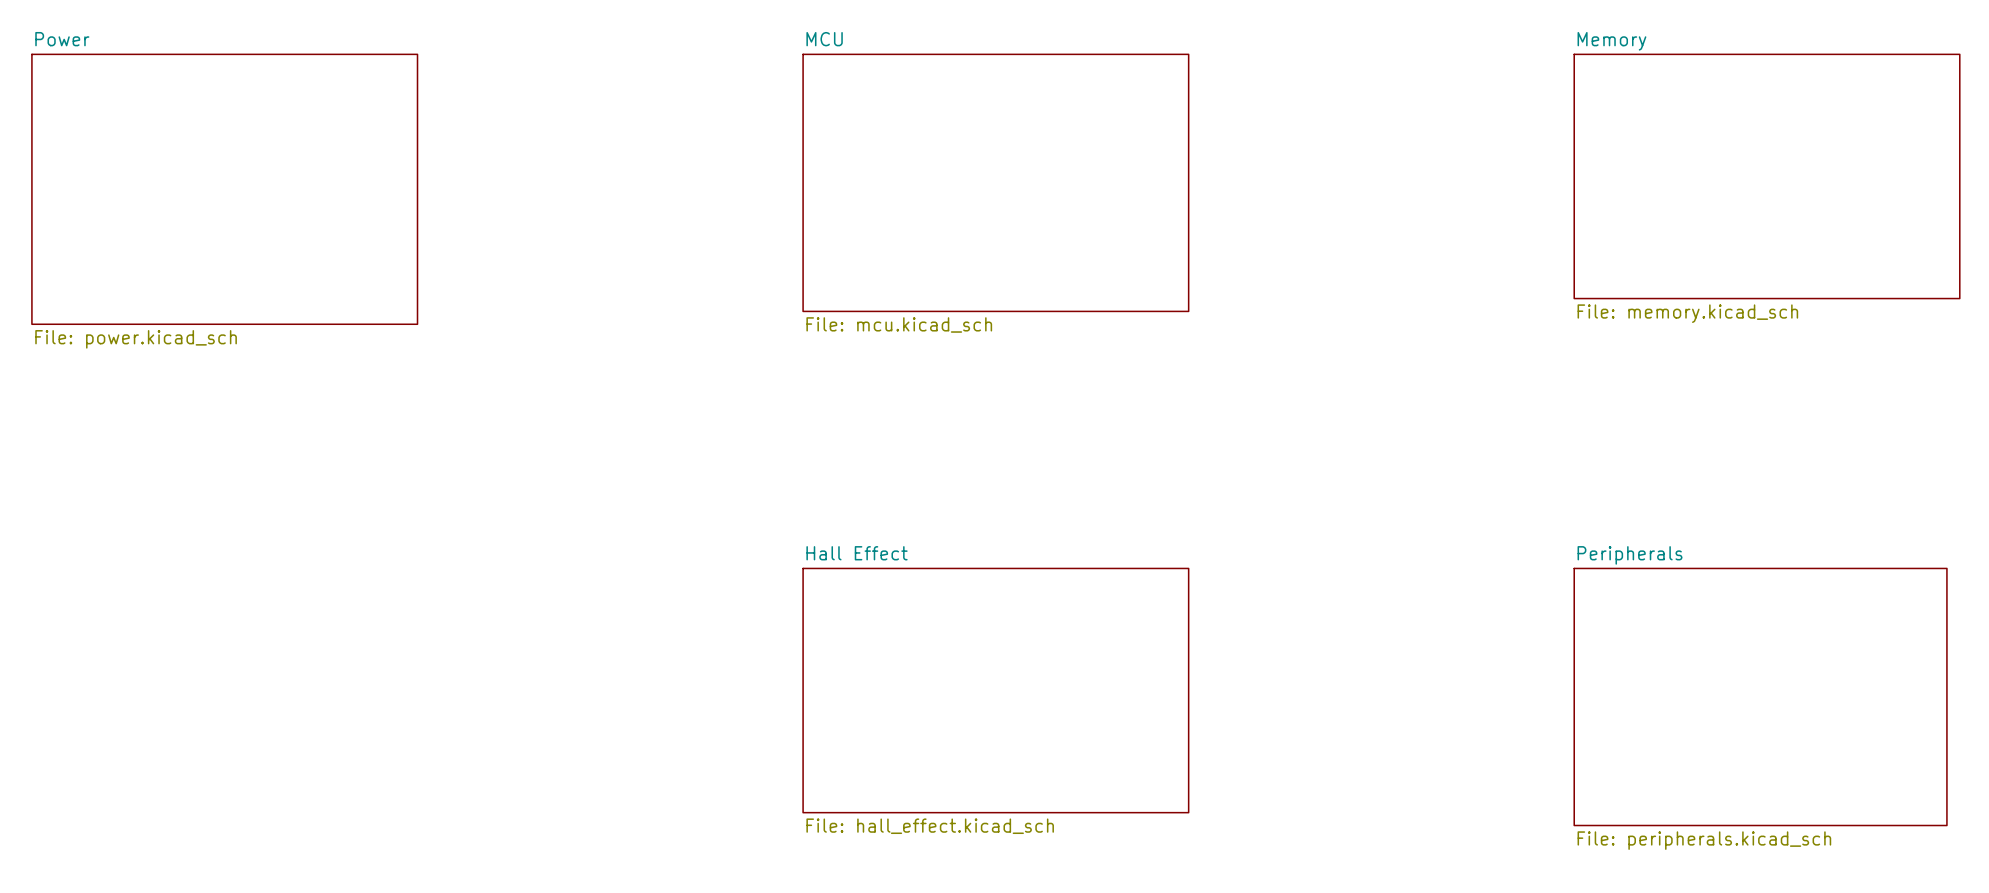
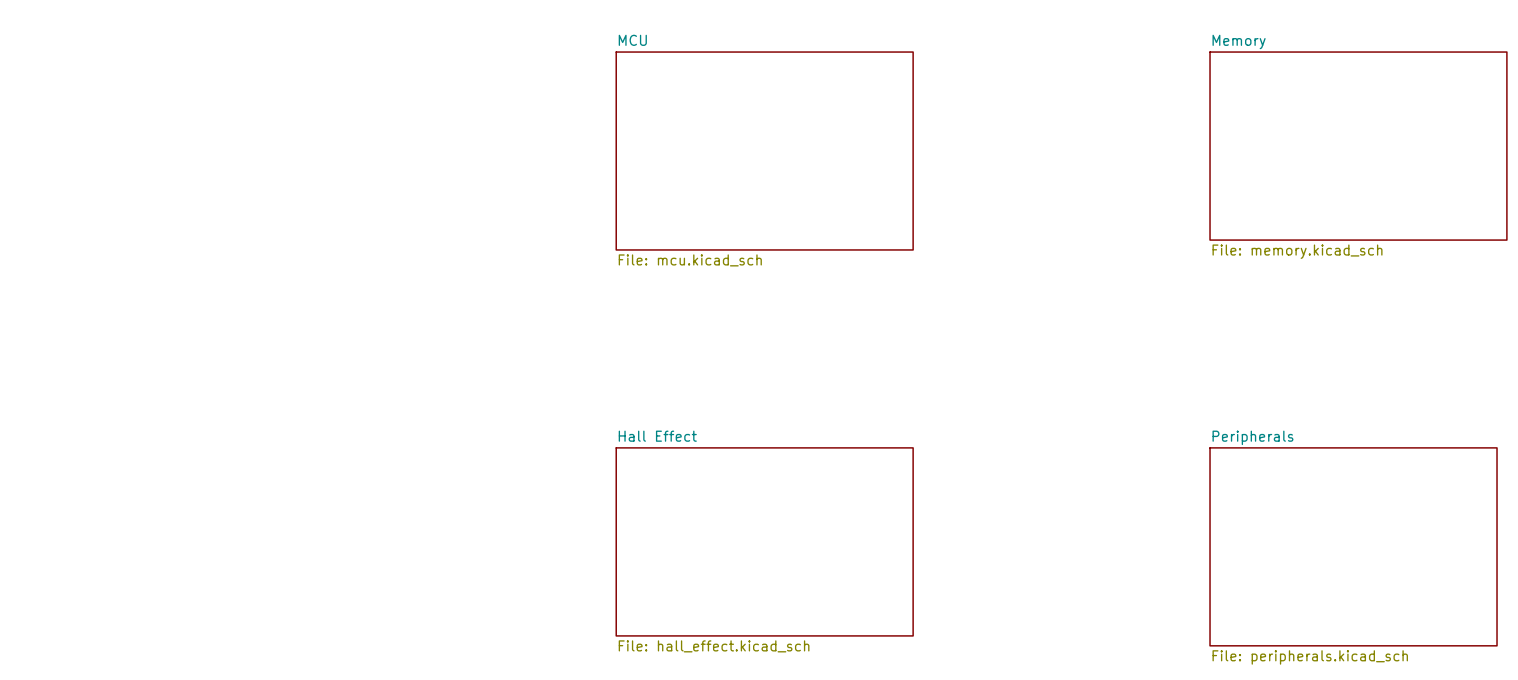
sheet Power: File: power.kicad_sch (224, 189) -> none

